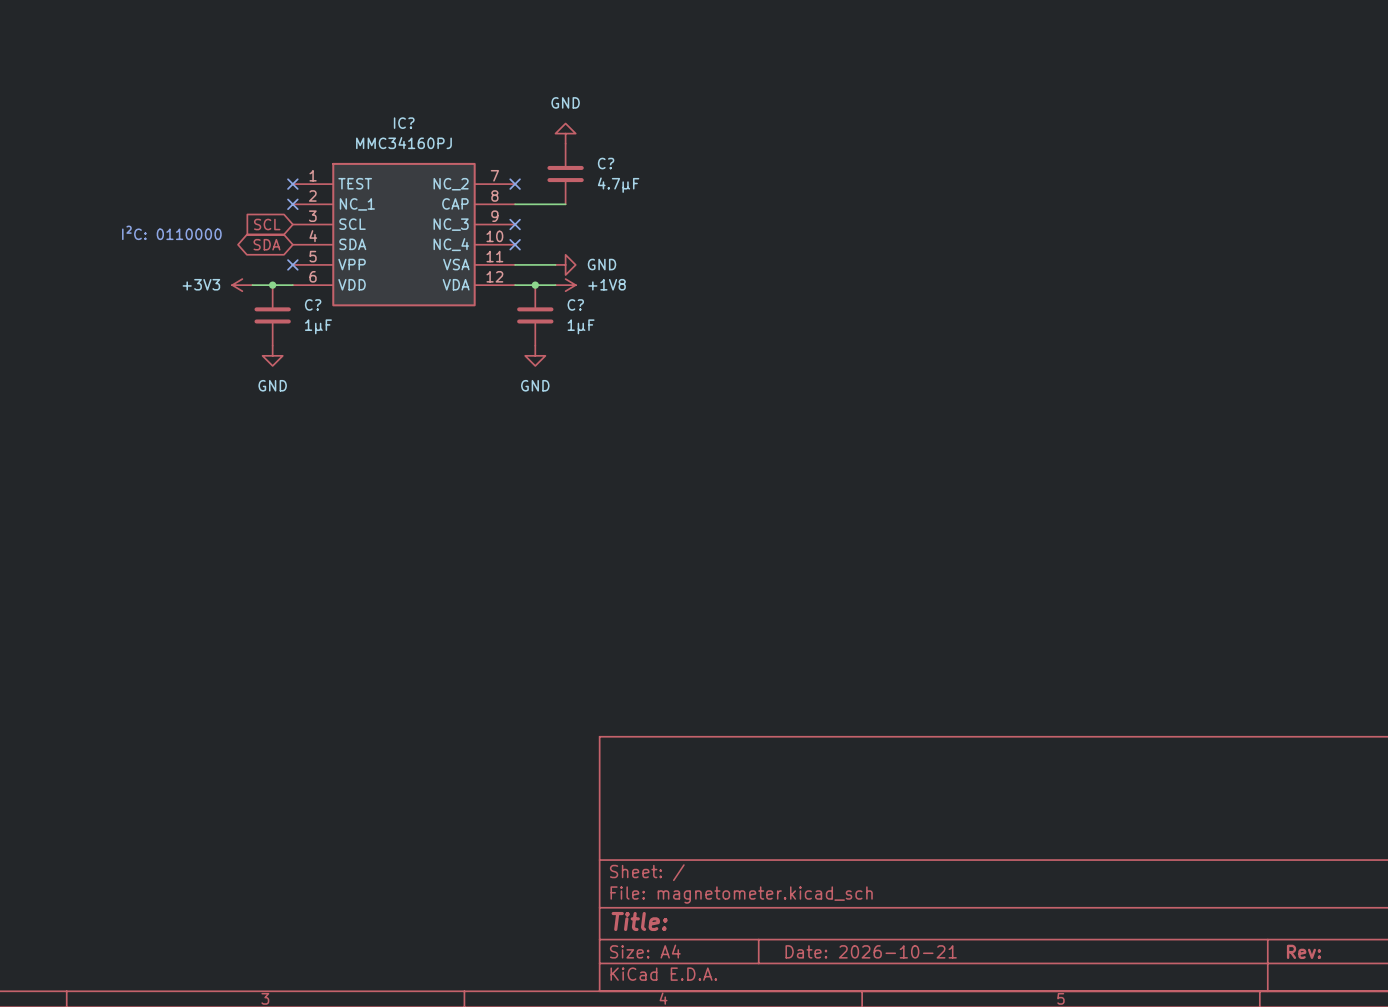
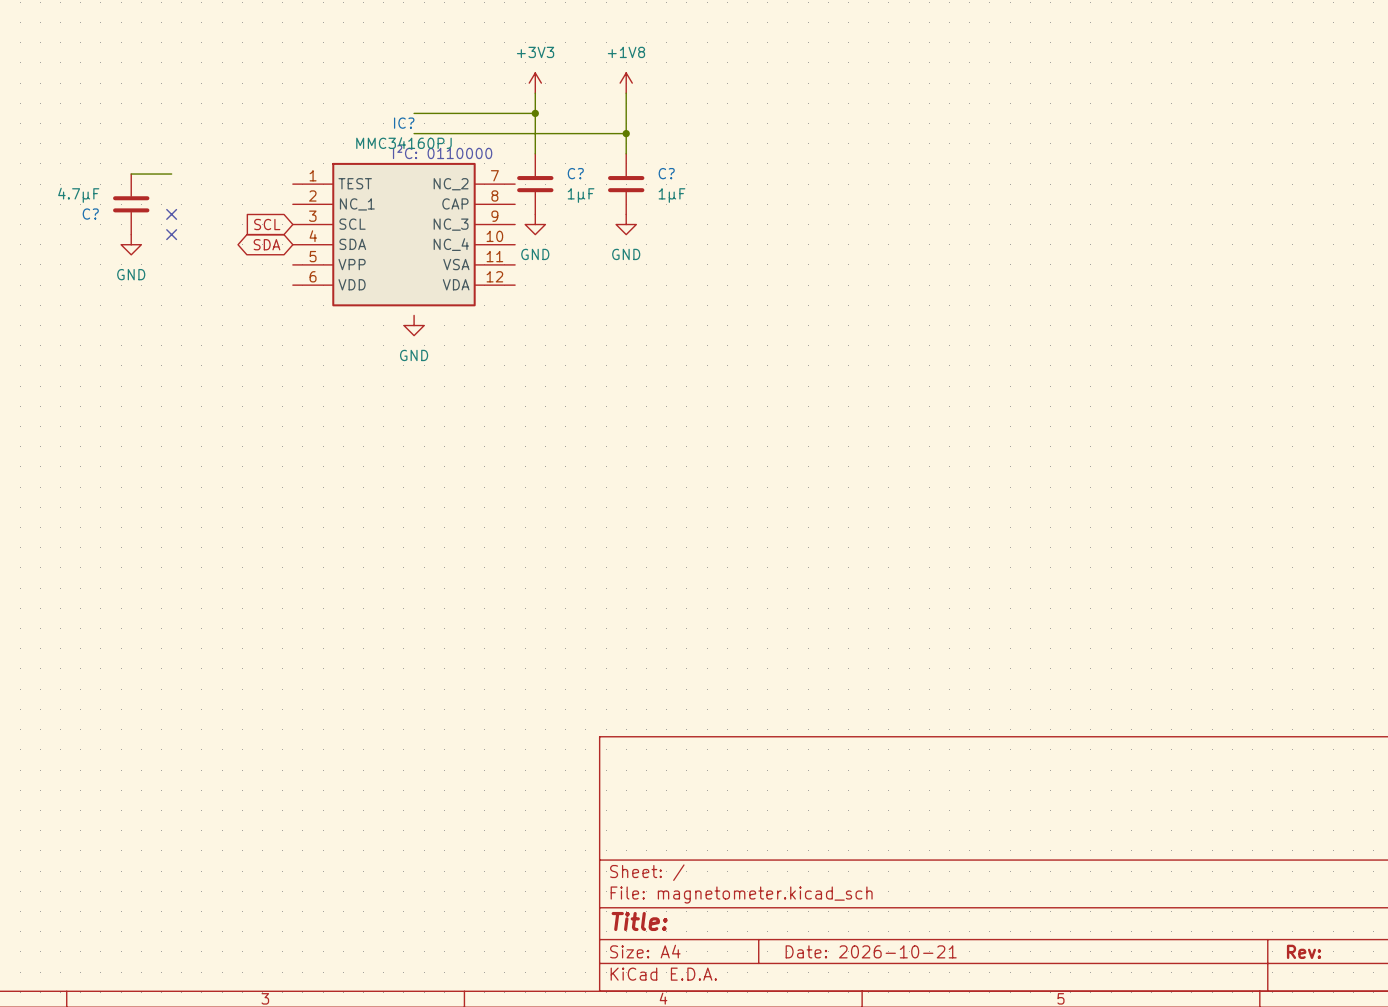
power symbol: none -> +3V3 (535, 83)
power symbol: none -> +1V8 (626, 83)
wire: none -> (535, 93) (535, 153)
wire: none -> (626, 93) (626, 153)
wire: none -> (414, 113) (535, 113)
junction: none -> (535, 113)
wire: none -> (414, 133) (626, 133)
power symbol: GND (565, 133) -> none
junction: none -> (626, 133)
text: none -> I²C: 0110000 (442, 152)
C?: 4.7µF (565, 174) -> none
no-connect mark: (292, 184) -> none
no-connect mark: (515, 184) -> none
C?: none -> 1µF (535, 184)
C?: none -> 1µF (626, 184)
C?: none -> 4.7µF (131, 204)
no-connect mark: (292, 204) -> none
wire: (515, 204) (565, 204) -> none
no-connect mark: none -> (171, 214)
no-connect mark: (515, 224) -> none
power symbol: none -> GND (535, 224)
power symbol: none -> GND (626, 224)
text: I²C: 0110000 (171, 232) -> none
no-connect mark: none -> (171, 234)
power symbol: none -> GND (131, 244)
no-connect mark: (515, 244) -> none
no-connect mark: (292, 264) -> none
wire: (515, 264) (555, 264) -> none
power symbol: GND (565, 264) -> none
power symbol: +3V3 (242, 285) -> none
wire: (252, 285) (292, 285) -> (131, 174) (171, 174)
junction: (272, 285) -> none
wire: (515, 285) (555, 285) -> none
junction: (535, 285) -> none
power symbol: +1V8 (565, 285) -> none
C?: 1µF (272, 315) -> none
C?: 1µF (535, 315) -> none
power symbol: none -> GND (414, 325)
power symbol: GND (272, 355) -> none
power symbol: GND (535, 355) -> none

